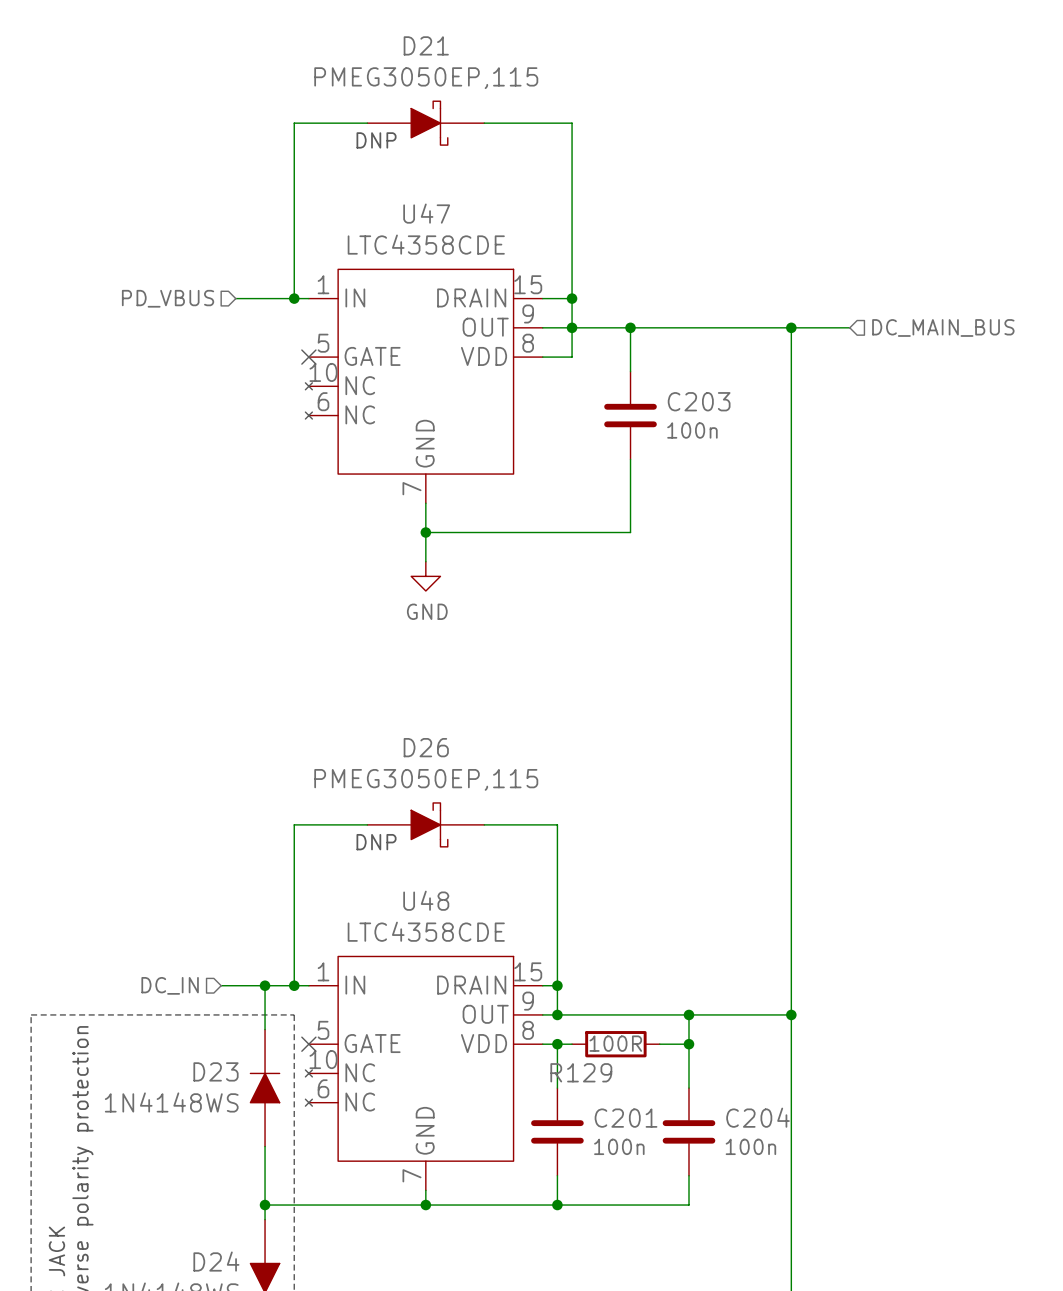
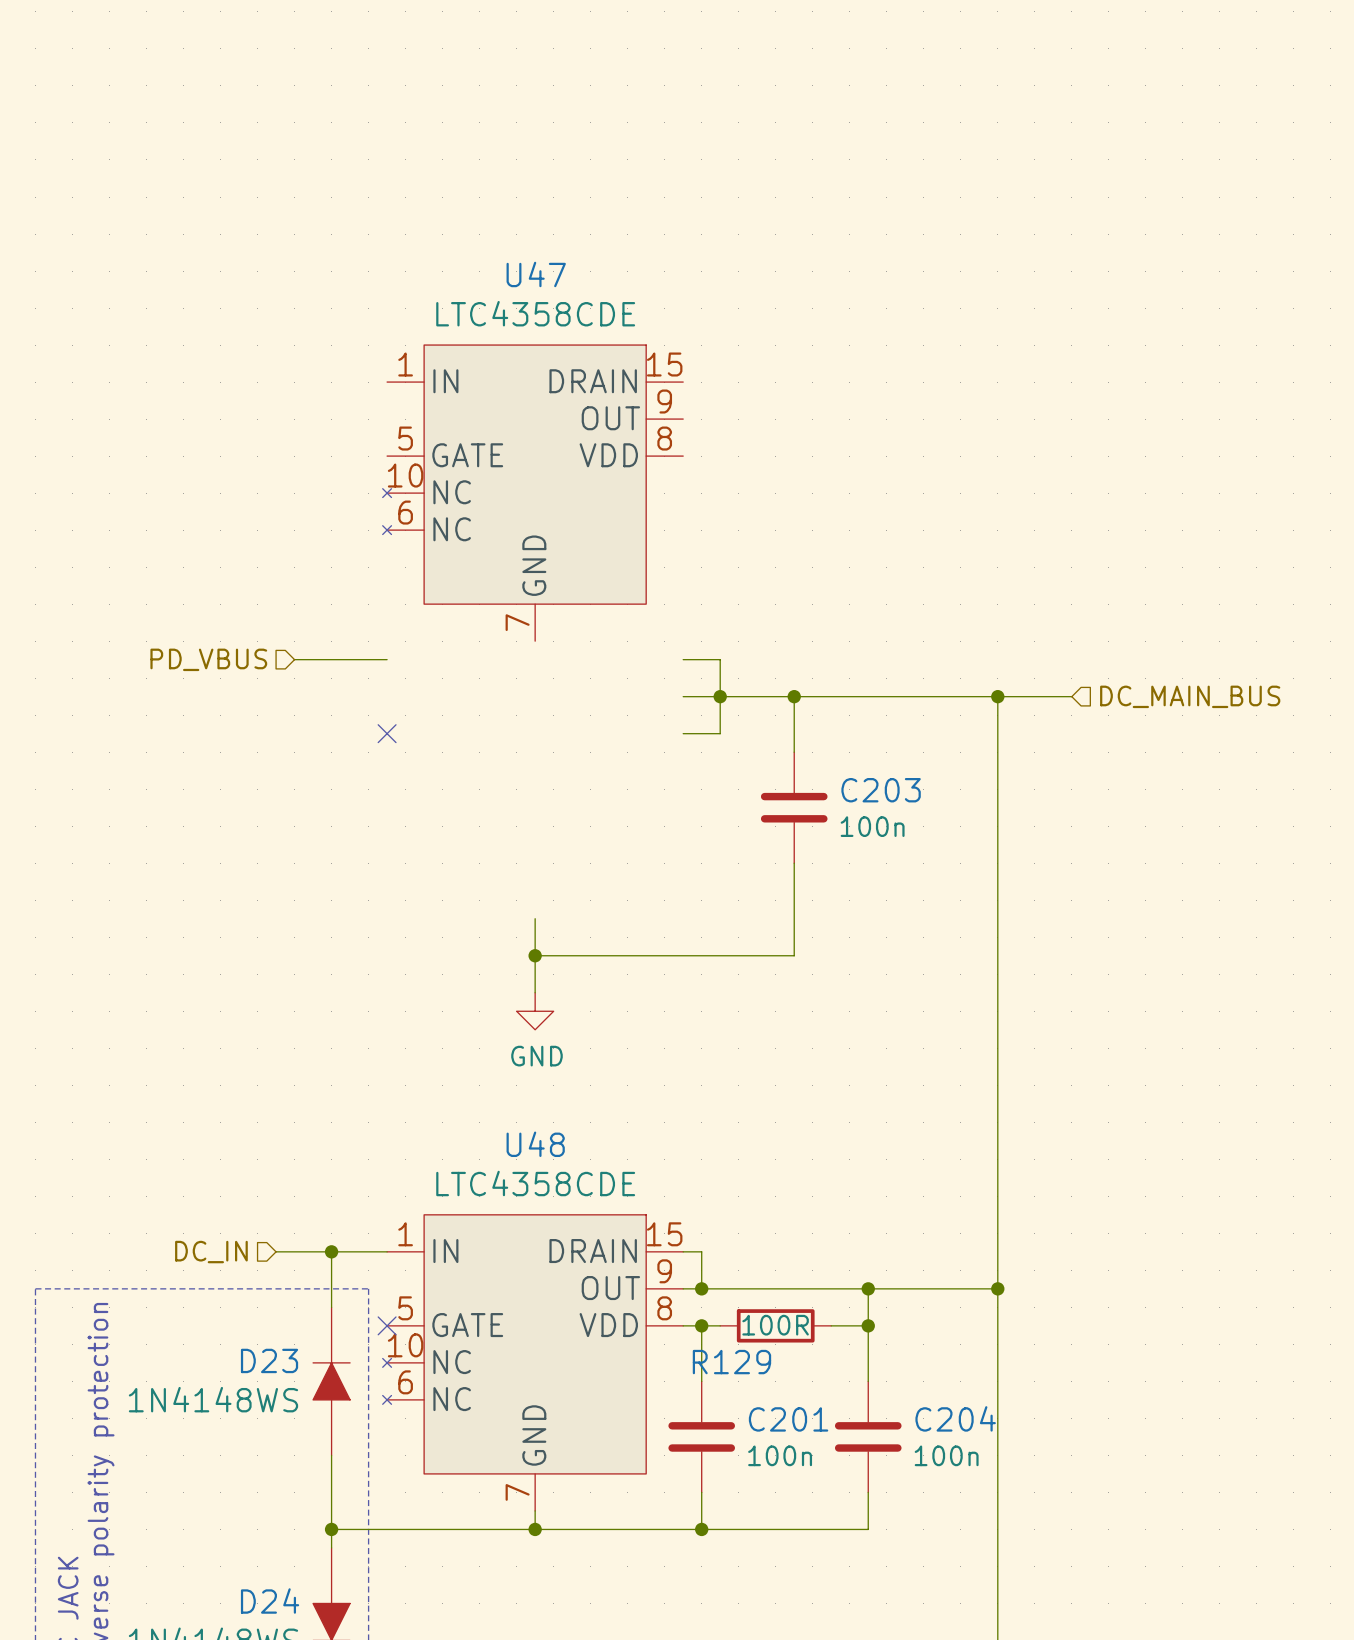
wire: (367, 123) (294, 123) (294, 298) -> none
D21: PMEG3050EP,115 (425, 123) -> none
wire: (484, 123) (572, 123) (572, 357) (542, 357) -> none
text: DNP (376, 140) -> none
hierarchical label position: PD_VBUS (168, 298) -> PD_VBUS (208, 659)
wire: (235, 298) (308, 298) -> (294, 659) (387, 659)
junction: (294, 298) -> none
wire: (542, 298) (572, 298) -> none
junction: (572, 298) -> none
wire: (542, 327) (849, 327) -> (683, 696) (1071, 696)
junction: (572, 327) -> none
wire: (630, 327) (630, 371) -> (794, 696) (794, 752)
junction: (630, 327) -> none
wire: (791, 327) (791, 547) -> none
junction: (791, 327) -> none
hierarchical label position: DC_MAIN_BUS (943, 327) -> DC_MAIN_BUS (1190, 696)
no-connect mark: (308, 357) -> none
C203 position: (630, 415) -> (794, 807)
wire: (630, 459) (630, 532) (425, 532) -> (794, 863) (794, 955) (535, 955)
wire: (425, 503) (425, 561) -> (535, 918) (535, 992)
wire: none -> (683, 659) (720, 659) (720, 733) (683, 733)
junction: (425, 532) -> none
junction: none -> (720, 696)
junction: none -> (794, 696)
junction: none -> (997, 696)
no-connect mark: none -> (387, 733)
power symbol position: GND (425, 576) -> GND (535, 1011)
junction: none -> (535, 955)
wire: (367, 824) (294, 824) (294, 985) -> none
D26: PMEG3050EP,115 (425, 824) -> none
wire: (484, 824) (557, 824) (557, 985) -> none
text: DNP (376, 842) -> none
junction: (294, 985) -> none
junction: (557, 985) -> none

